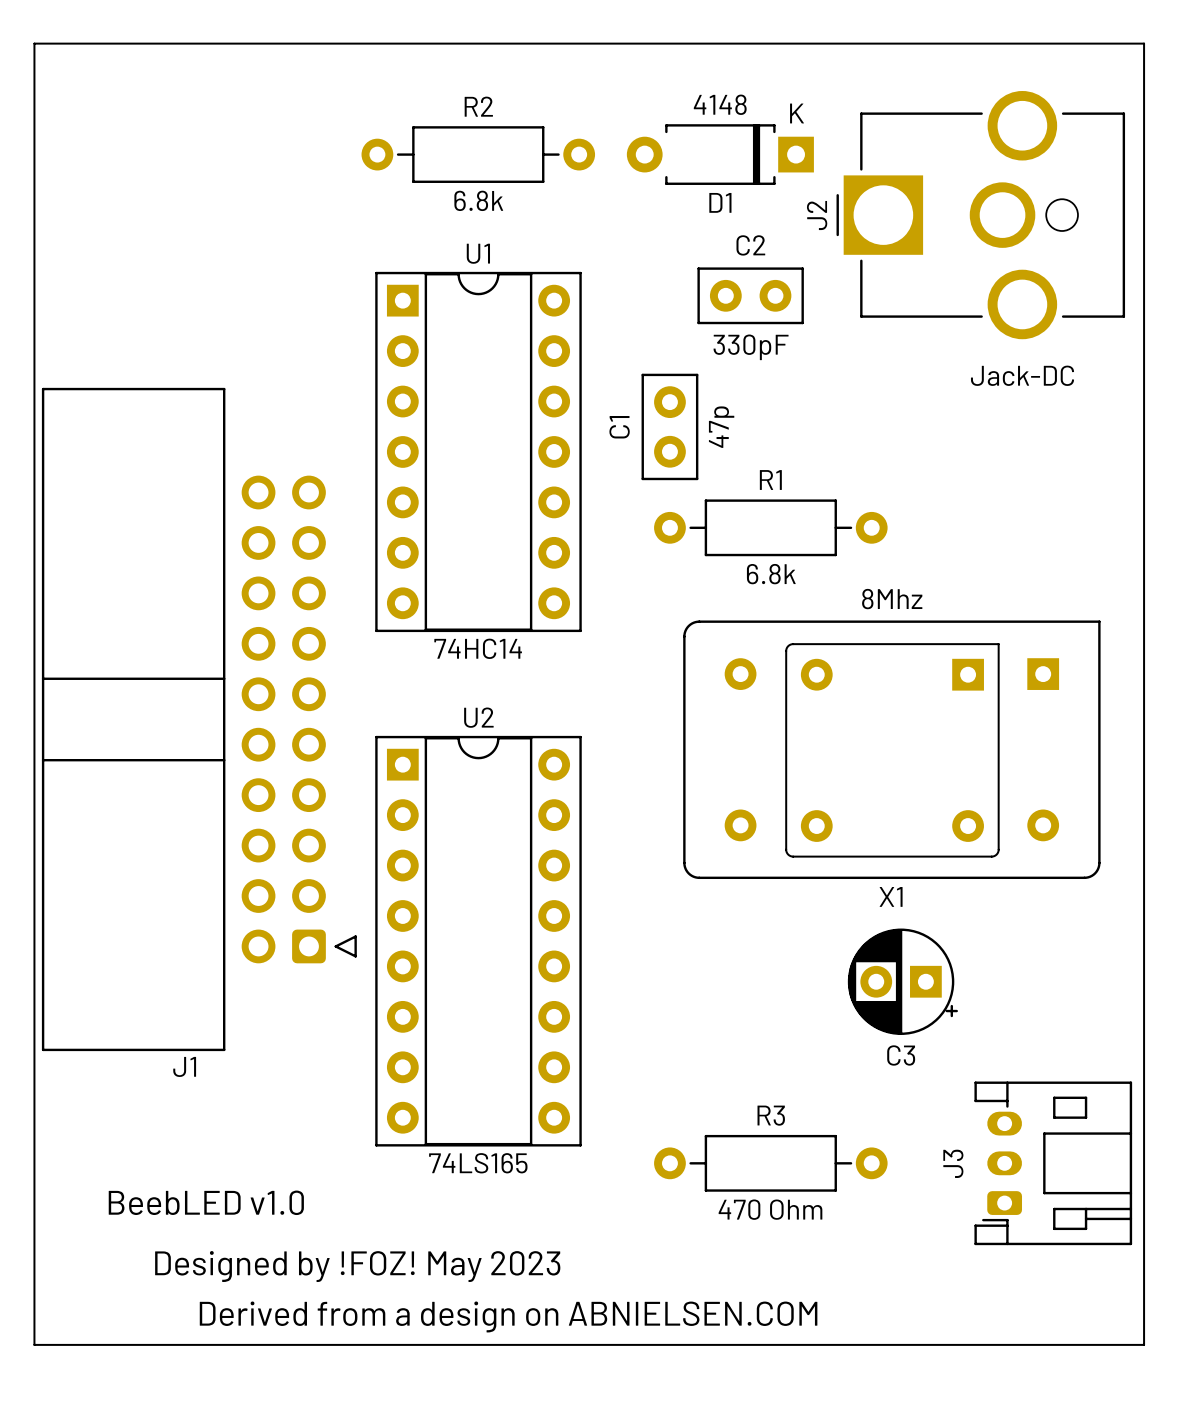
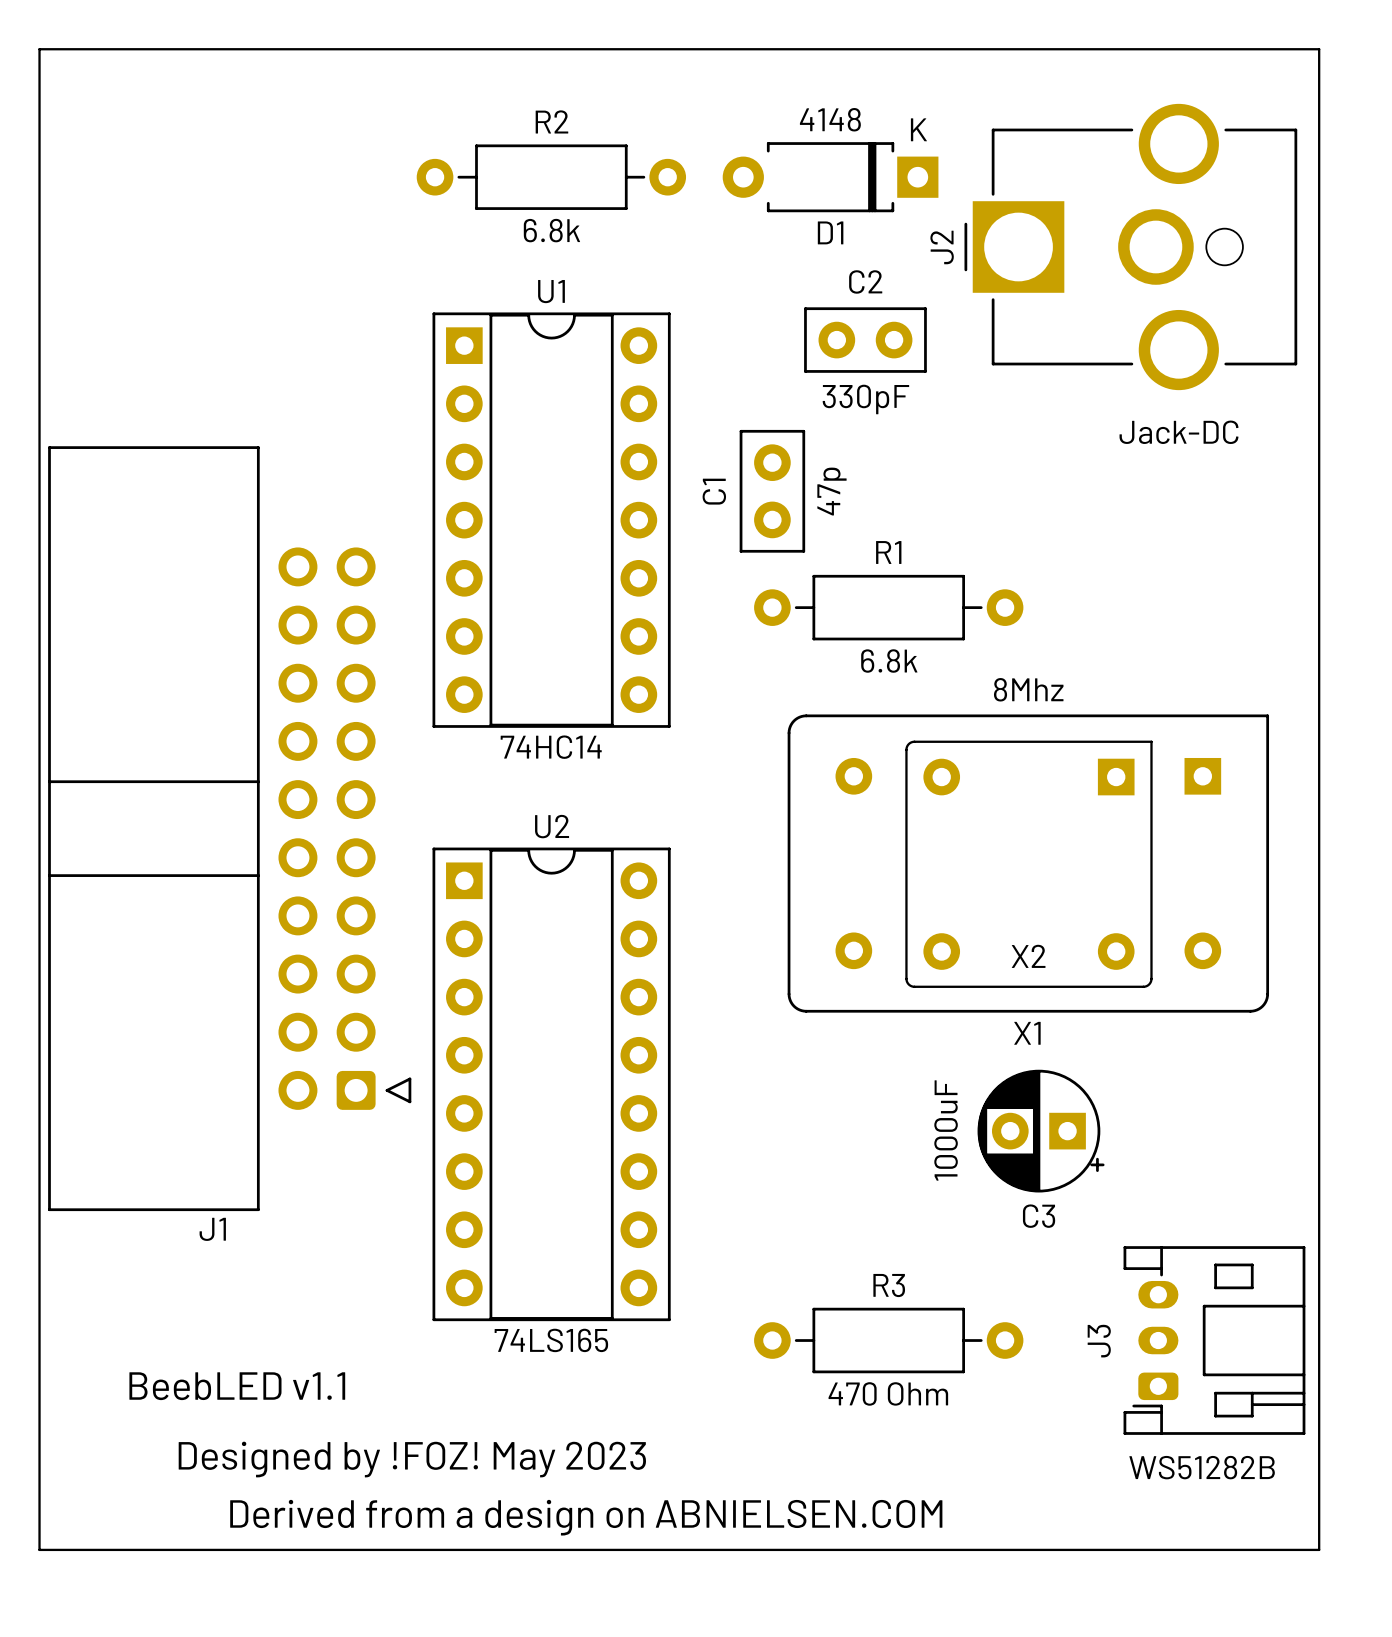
X2 name: none -> X2 (1028, 956)
C3 value: none -> 1000uF (946, 1130)
text: BeebLED v1.0 (206, 1202) -> BeebLED v1.1 (237, 1386)
J3 value: none -> WS51282B (1202, 1467)

